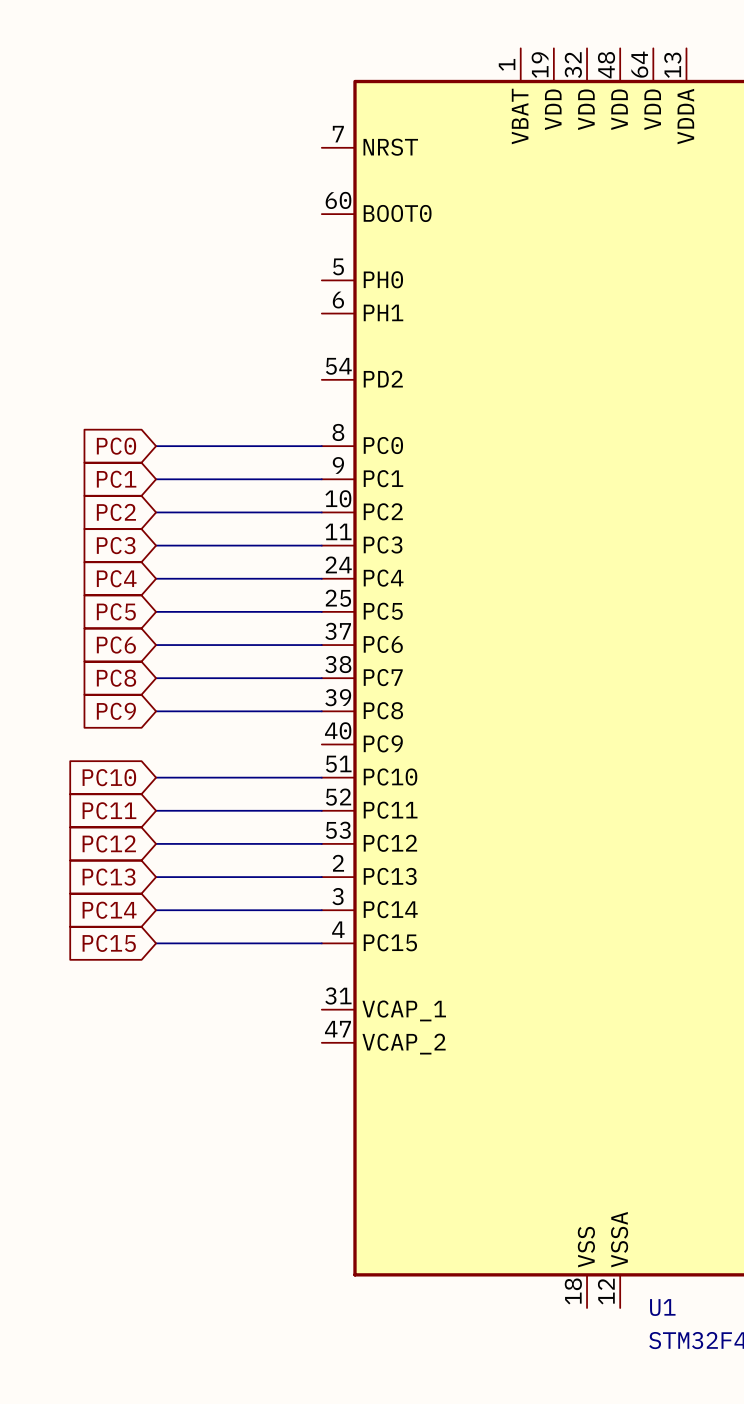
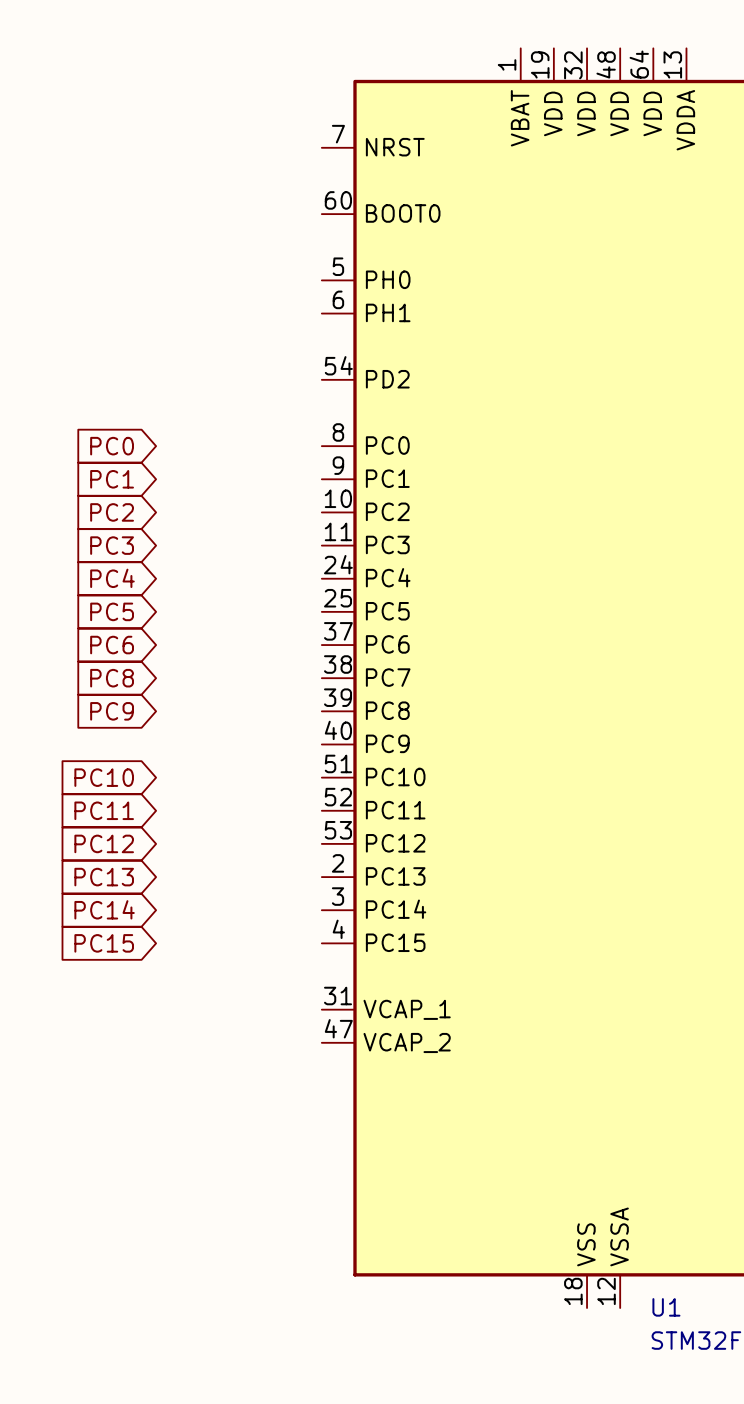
wire: (156, 446) (321, 446) -> none
wire: (156, 479) (321, 479) -> none
wire: (156, 512) (321, 512) -> none
wire: (156, 545) (321, 545) -> none
wire: (156, 578) (321, 578) -> none
wire: (156, 611) (321, 611) -> none
wire: (156, 645) (321, 645) -> none
wire: (156, 678) (321, 678) -> none
wire: (156, 711) (321, 711) -> none
wire: (156, 777) (321, 777) -> none
wire: (156, 810) (321, 810) -> none
wire: (156, 843) (321, 843) -> none
wire: (156, 877) (321, 877) -> none
wire: (156, 910) (321, 910) -> none
wire: (156, 943) (321, 943) -> none

